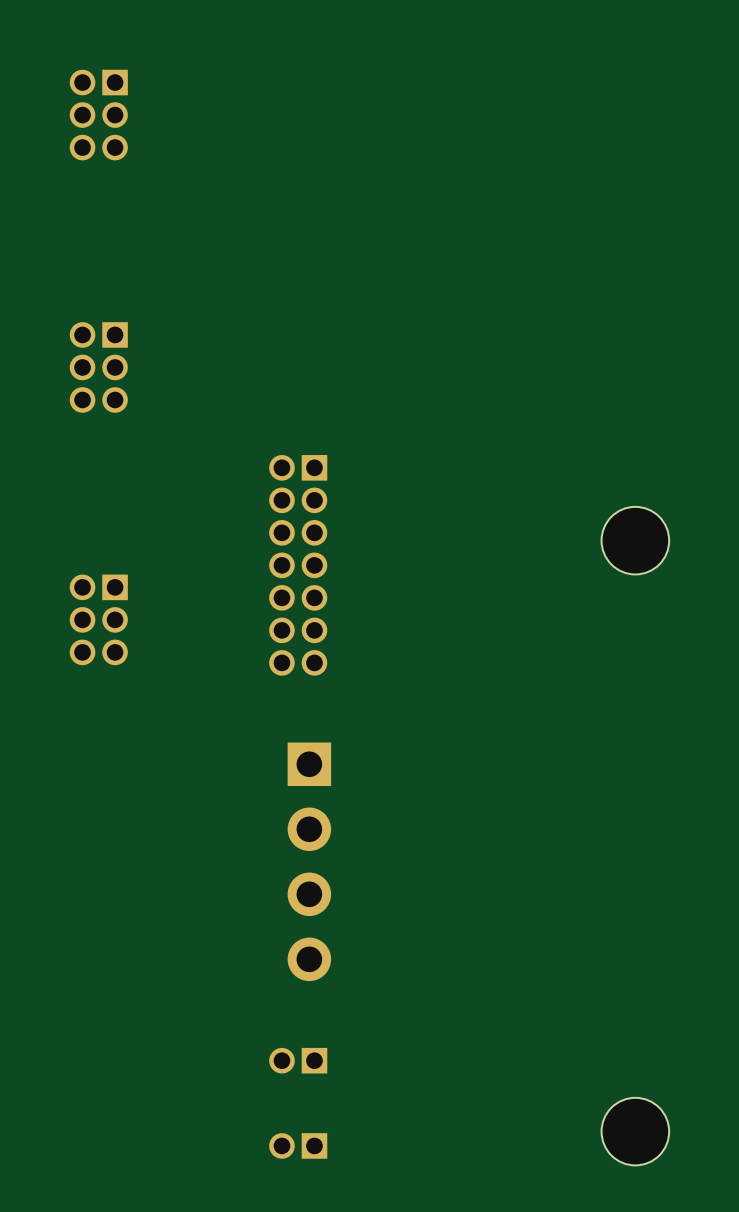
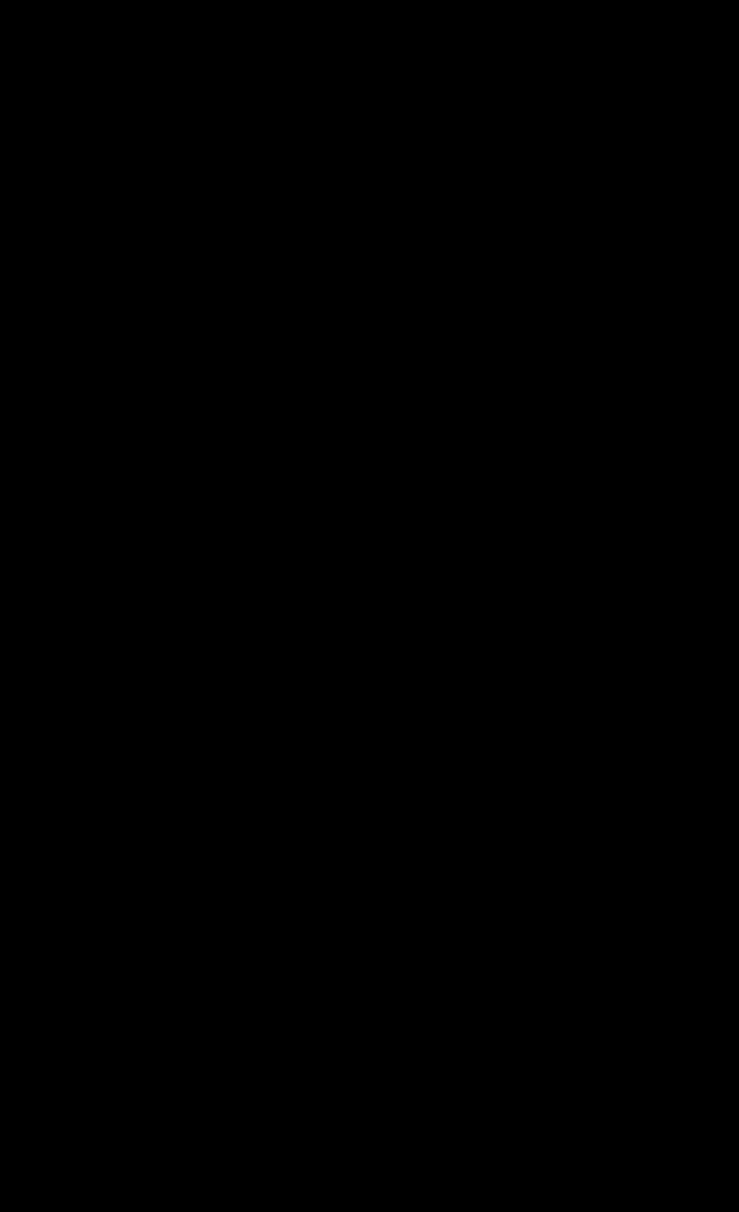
part: (98, 115) -> none
part: (98, 367) -> none
part: (635, 540) -> none
part: (298, 565) -> none
part: (98, 619) -> none
part: (309, 861) -> none
part: (298, 1060) -> none
part: (635, 1131) -> none
part: (298, 1145) -> none

